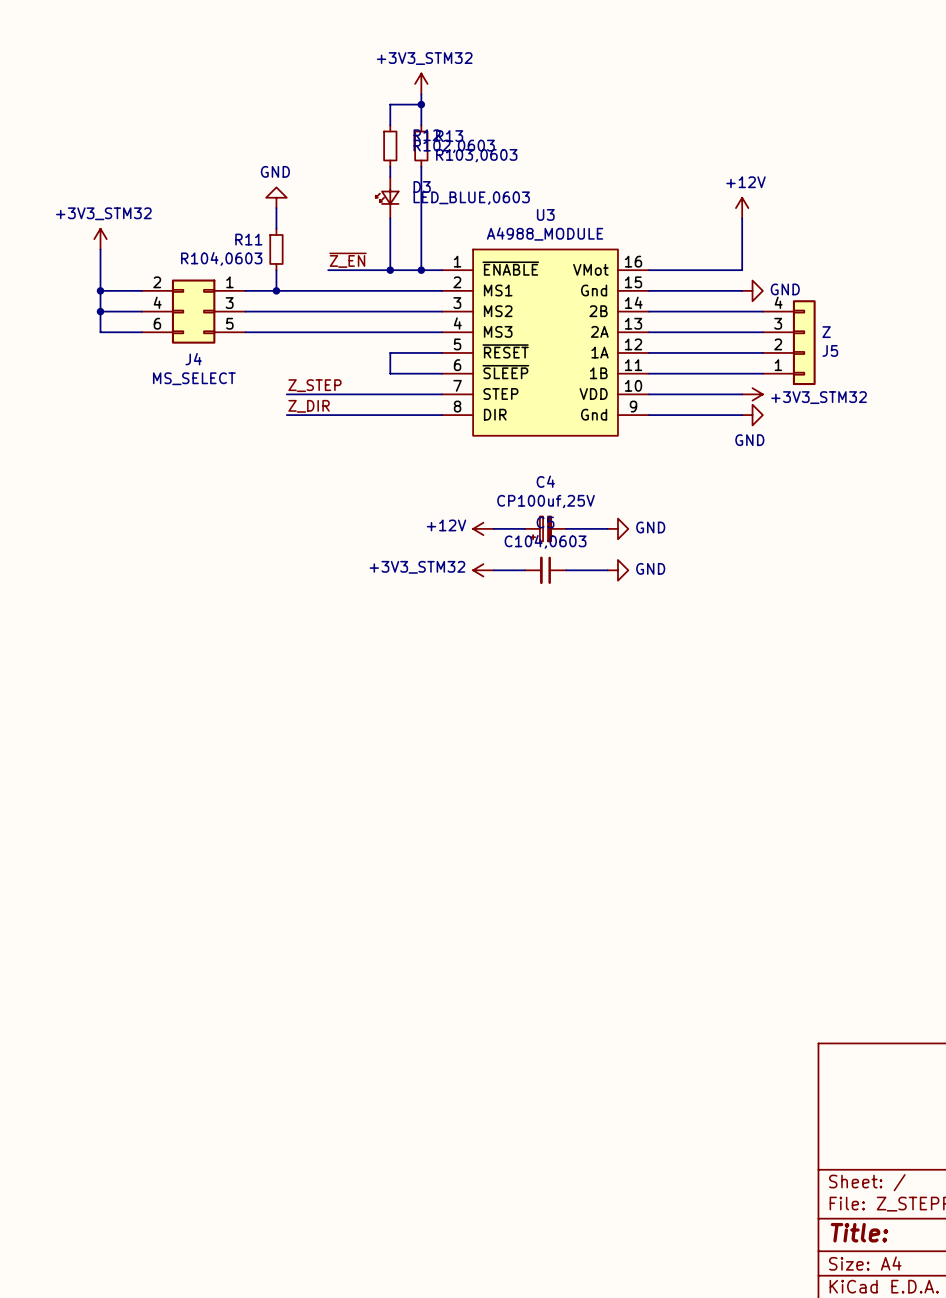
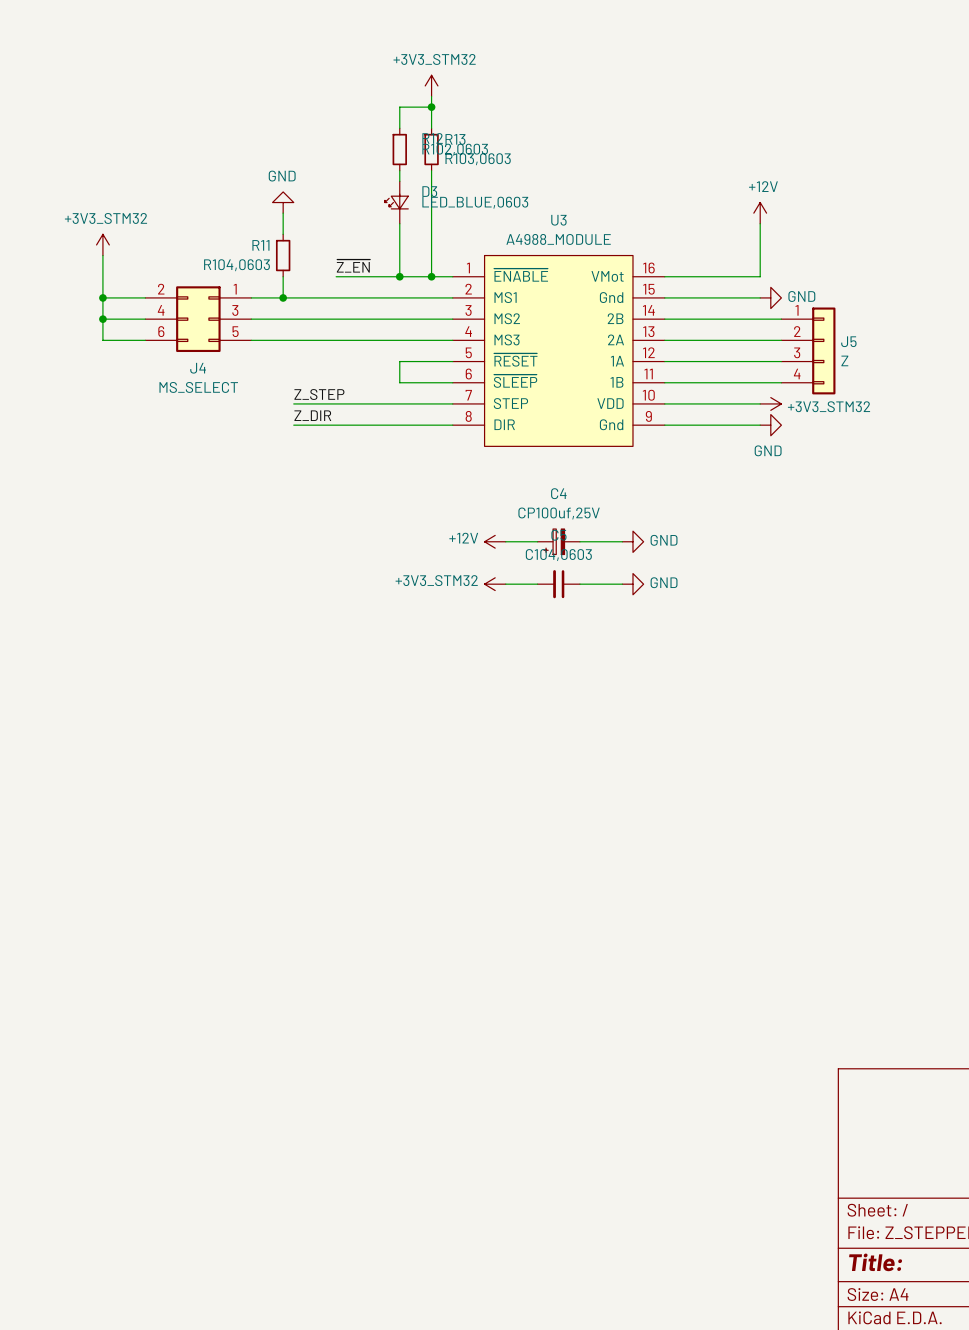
J5 flip: as is (804, 342) -> up-down (823, 350)

